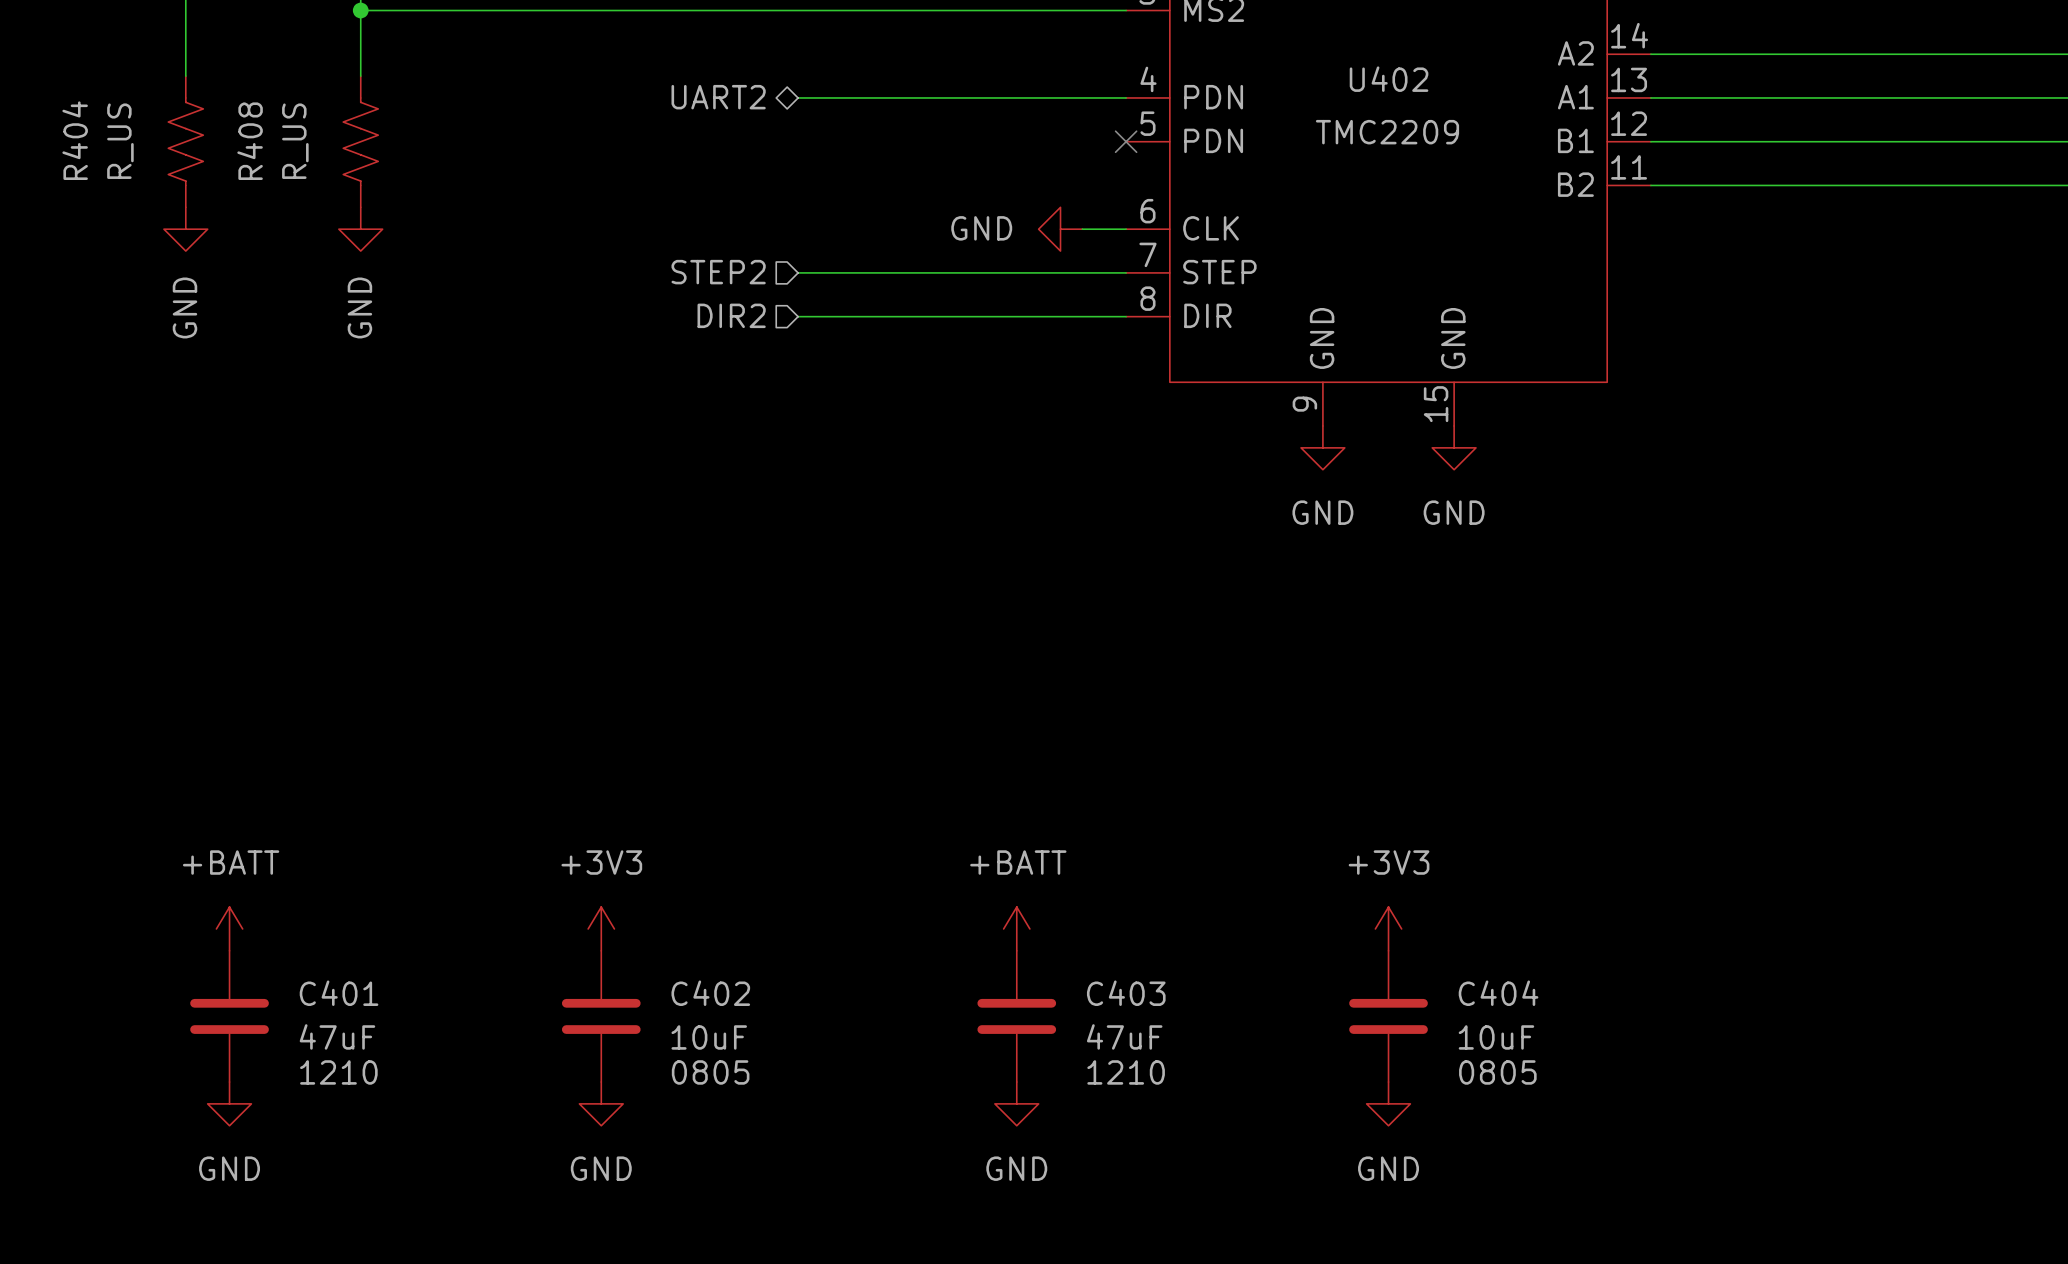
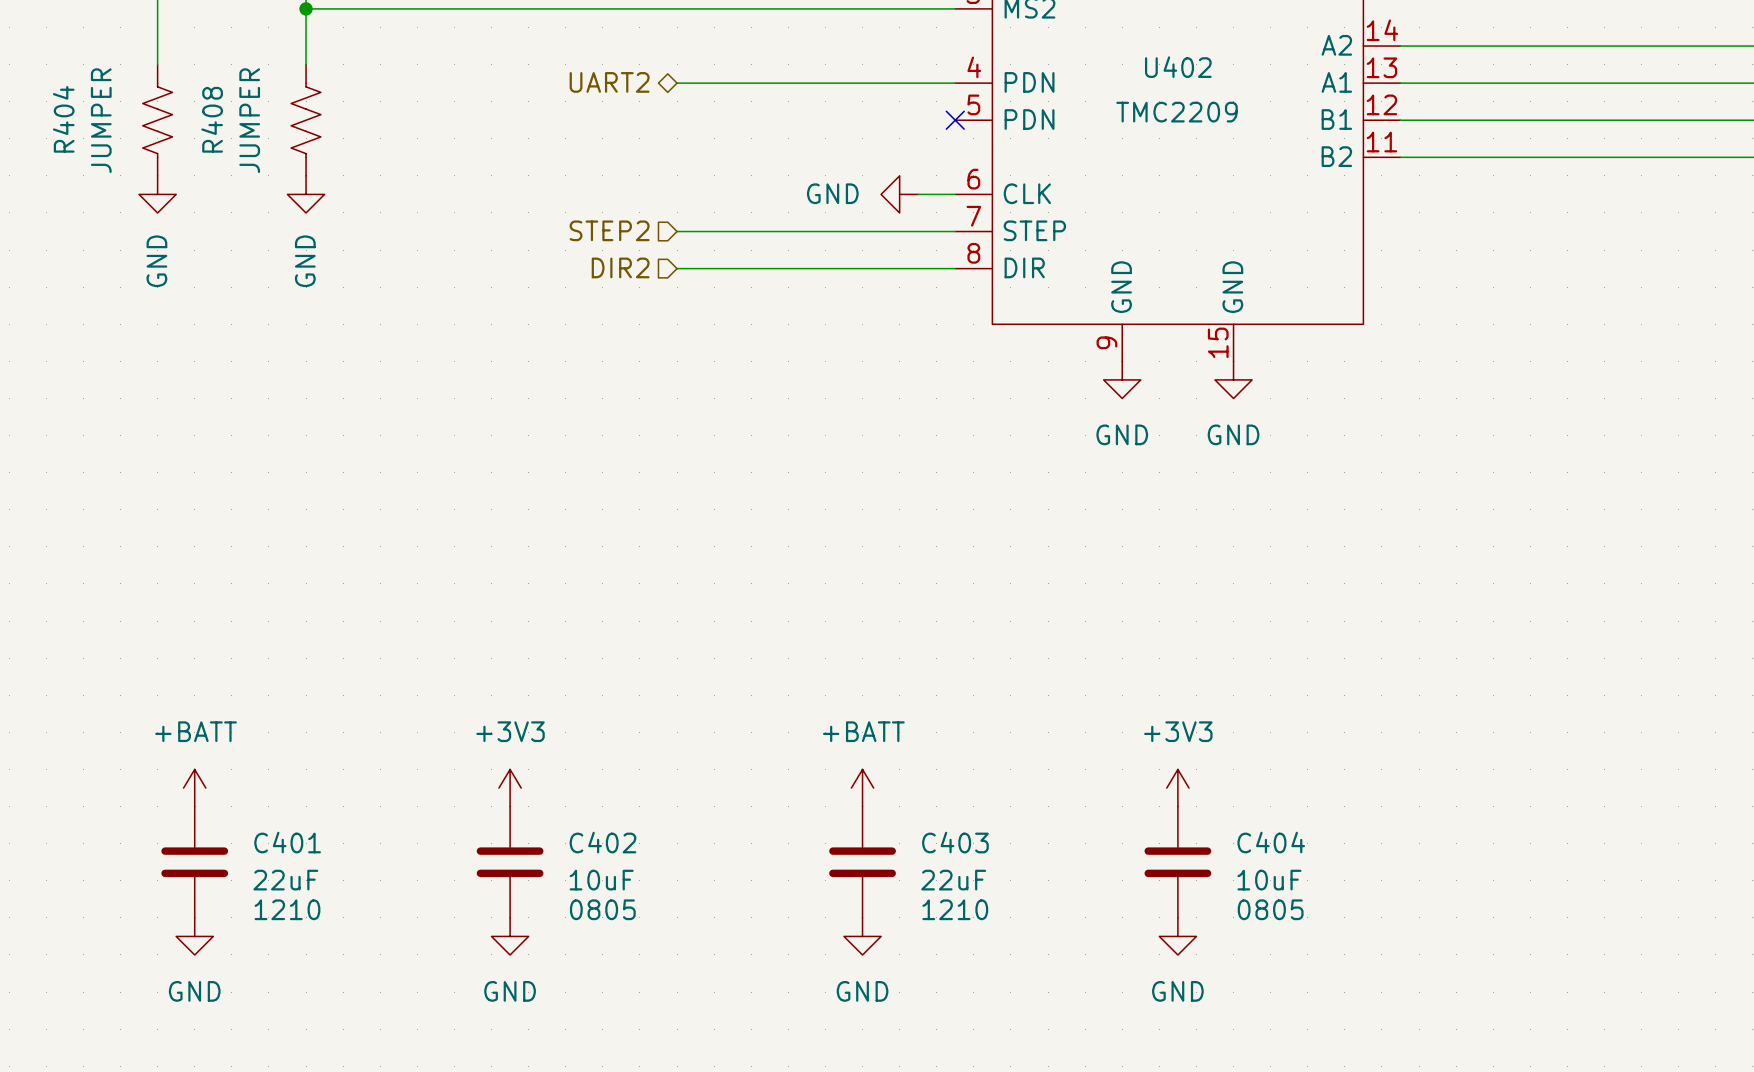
R404 value: R_US (120, 141) -> JUMPER (101, 120)
R408 value: R_US (295, 141) -> JUMPER (249, 120)
C401 value: 47uF (337, 1036) -> 22uF (285, 880)
C403 value: 47uF (1124, 1036) -> 22uF (953, 880)

